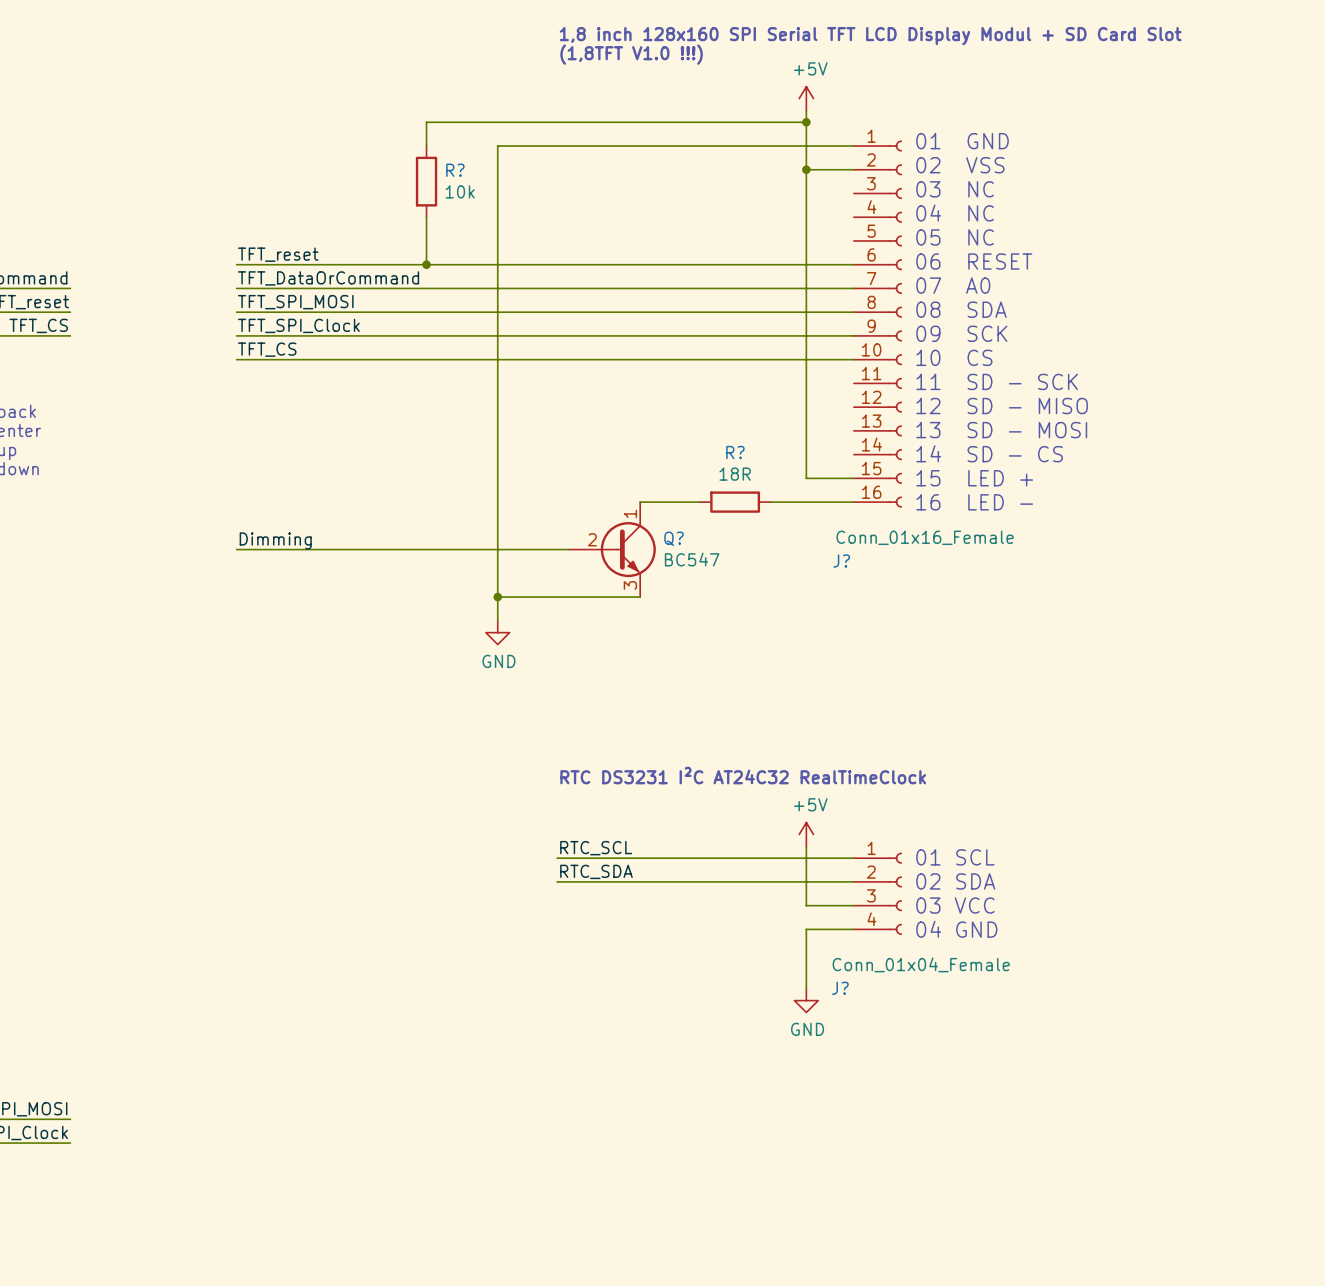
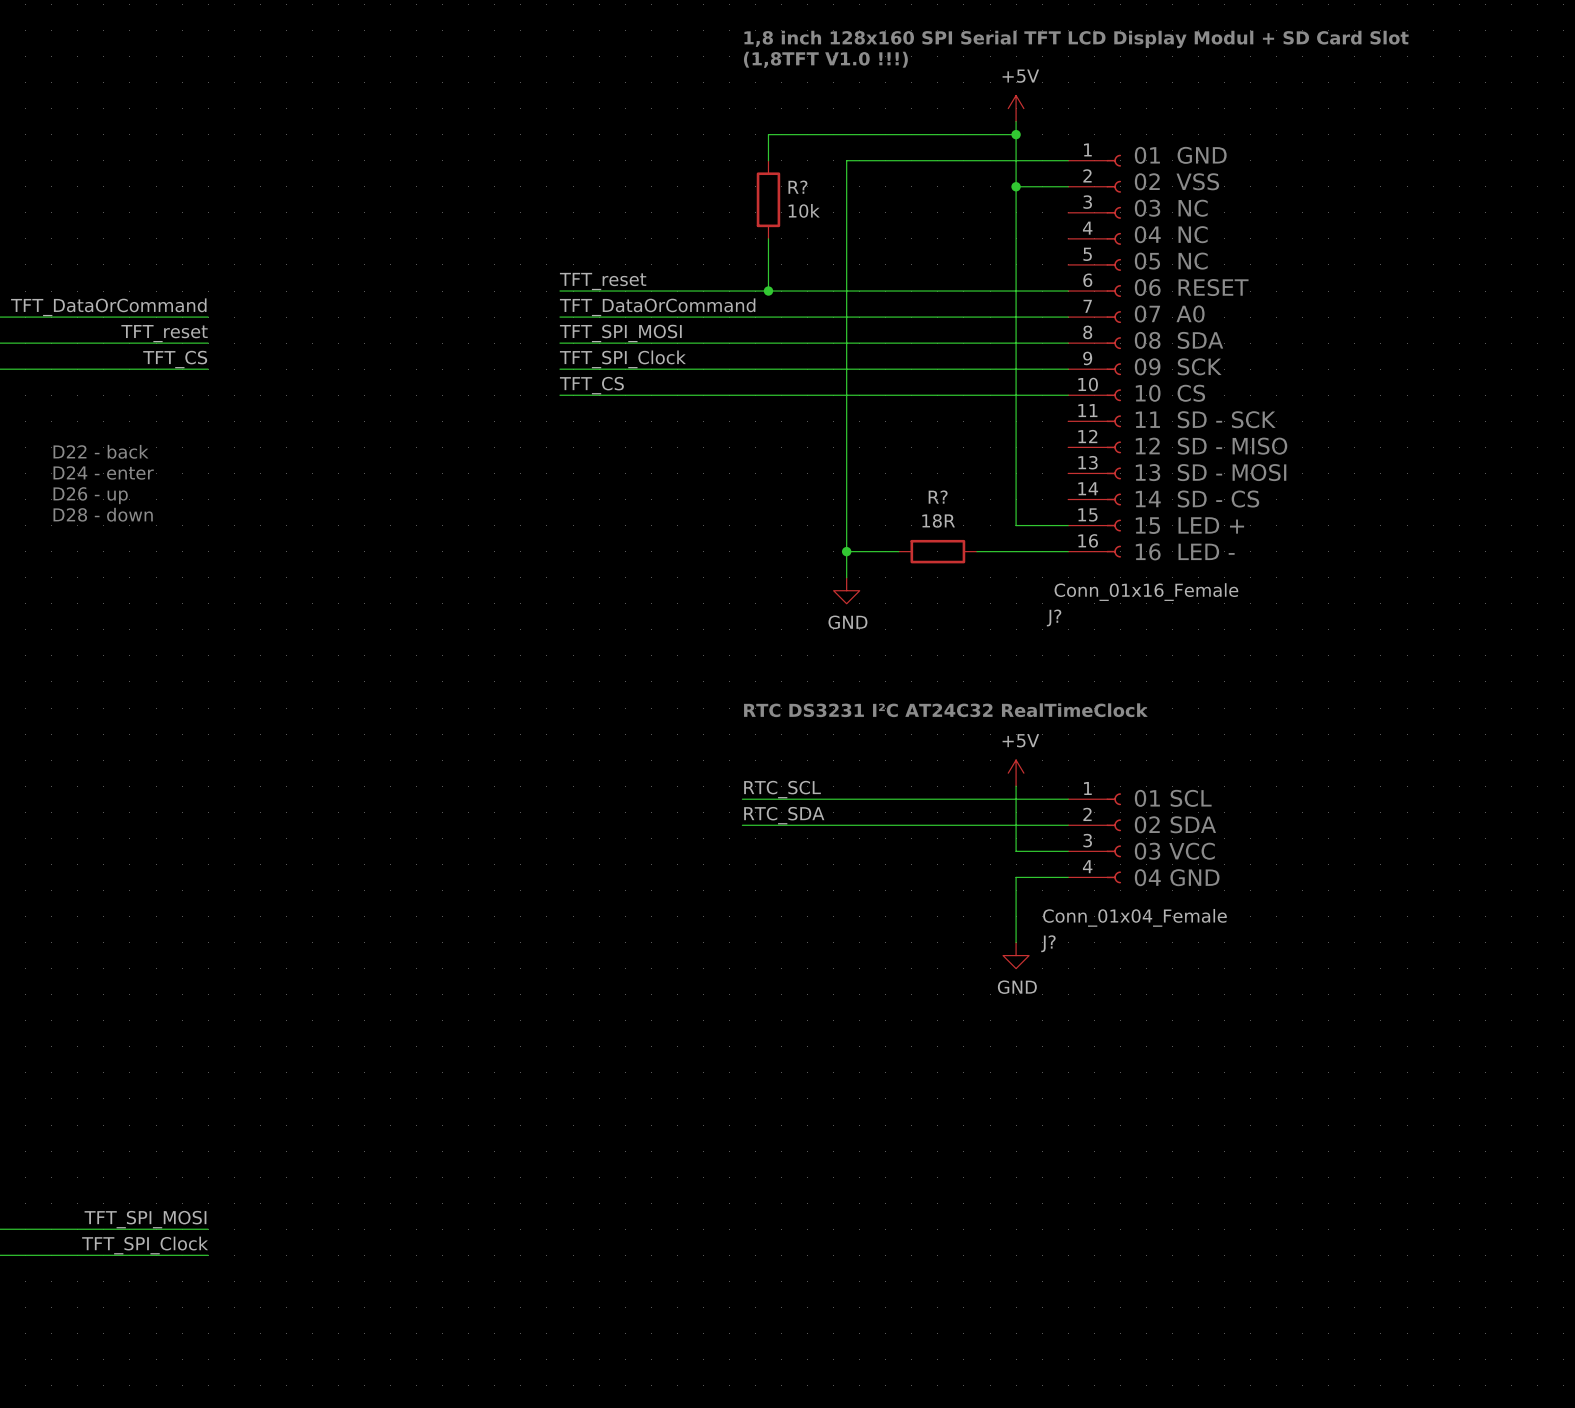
wire: (580, 122) (426, 122) (426, 146) -> (768, 134) (768, 160)
wire: (652, 146) (497, 146) (497, 620) -> (846, 160) (846, 577)
R? position: (426, 181) -> (768, 199)
wire: (426, 217) (426, 264) -> (768, 238) (768, 291)
label position: TFT_reset (278, 254) -> TFT_reset (603, 281)
wire: (236, 264) (390, 264) -> none
junction: (426, 264) -> none
junction: none -> (768, 291)
label position: TFT_DataOrCommand (328, 278) -> TFT_DataOrCommand (657, 307)
wire: (236, 288) (390, 288) -> none
label position: TFT_SPI_MOSI (295, 302) -> TFT_SPI_MOSI (620, 333)
wire: (236, 312) (390, 312) -> none
label position: TFT_SPI_Clock (298, 325) -> TFT_SPI_Clock (622, 359)
wire: (236, 335) (390, 335) -> none
label position: TFT_CS (267, 349) -> TFT_CS (591, 385)
wire: (236, 359) (390, 359) -> none
wire: (640, 502) (652, 502) -> none
junction: none -> (846, 551)
label: Dimming (275, 540) -> none
wire: (236, 549) (568, 549) -> none
Q?: BC547 (612, 549) -> none
wire: (497, 597) (640, 597) -> none
junction: (497, 597) -> none
power symbol position: GND (497, 632) -> GND (846, 590)
wire: none -> (1016, 786) (1016, 851) (1068, 851)
text position: RTC DS3231 I²C AT24C32 RealTimeClock (743, 775) -> RTC DS3231 I²C AT24C32 RealTimeClock (945, 710)
wire: none -> (1068, 877) (1016, 877) (1016, 929)
power symbol position: +5V (806, 834) -> +5V (1016, 773)
label position: RTC_SCL (596, 848) -> RTC_SCL (782, 789)
text position: 01 SCL (955, 857) -> 01 SCL (1173, 798)
wire: (557, 858) (853, 858) -> (742, 799) (1068, 799)
wire: (806, 858) (806, 905) (853, 905) -> none
label position: RTC_SDA (596, 871) -> RTC_SDA (784, 815)
wire: (557, 881) (853, 881) -> (742, 825) (1068, 825)
text position: 02 SDA (955, 881) -> 02 SDA (1175, 824)
J? position: (877, 893) -> (1094, 838)
text position: 03 VCC (955, 905) -> 03 VCC (1174, 851)
wire: (853, 929) (806, 929) (806, 988) -> none
text position: 04 GND (956, 929) -> 04 GND (1177, 877)
power symbol position: GND (806, 1000) -> GND (1016, 955)

